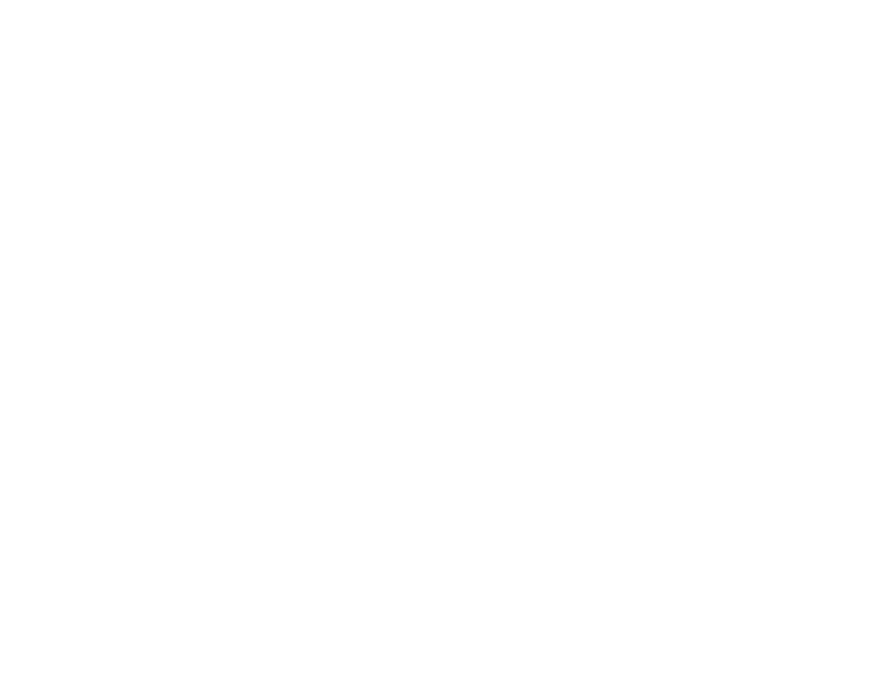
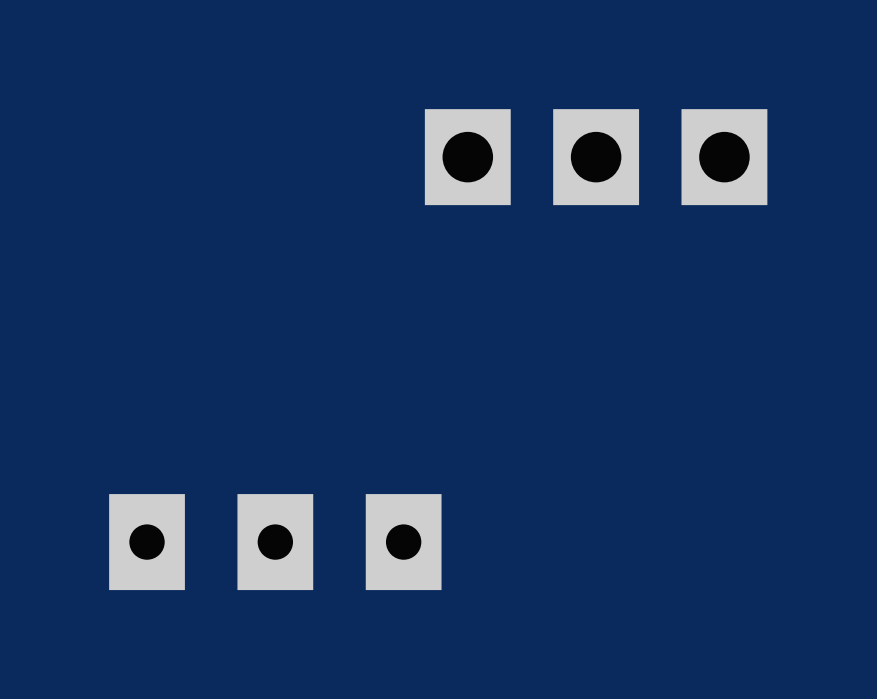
part: none -> (596, 157)
part: none -> (275, 542)

